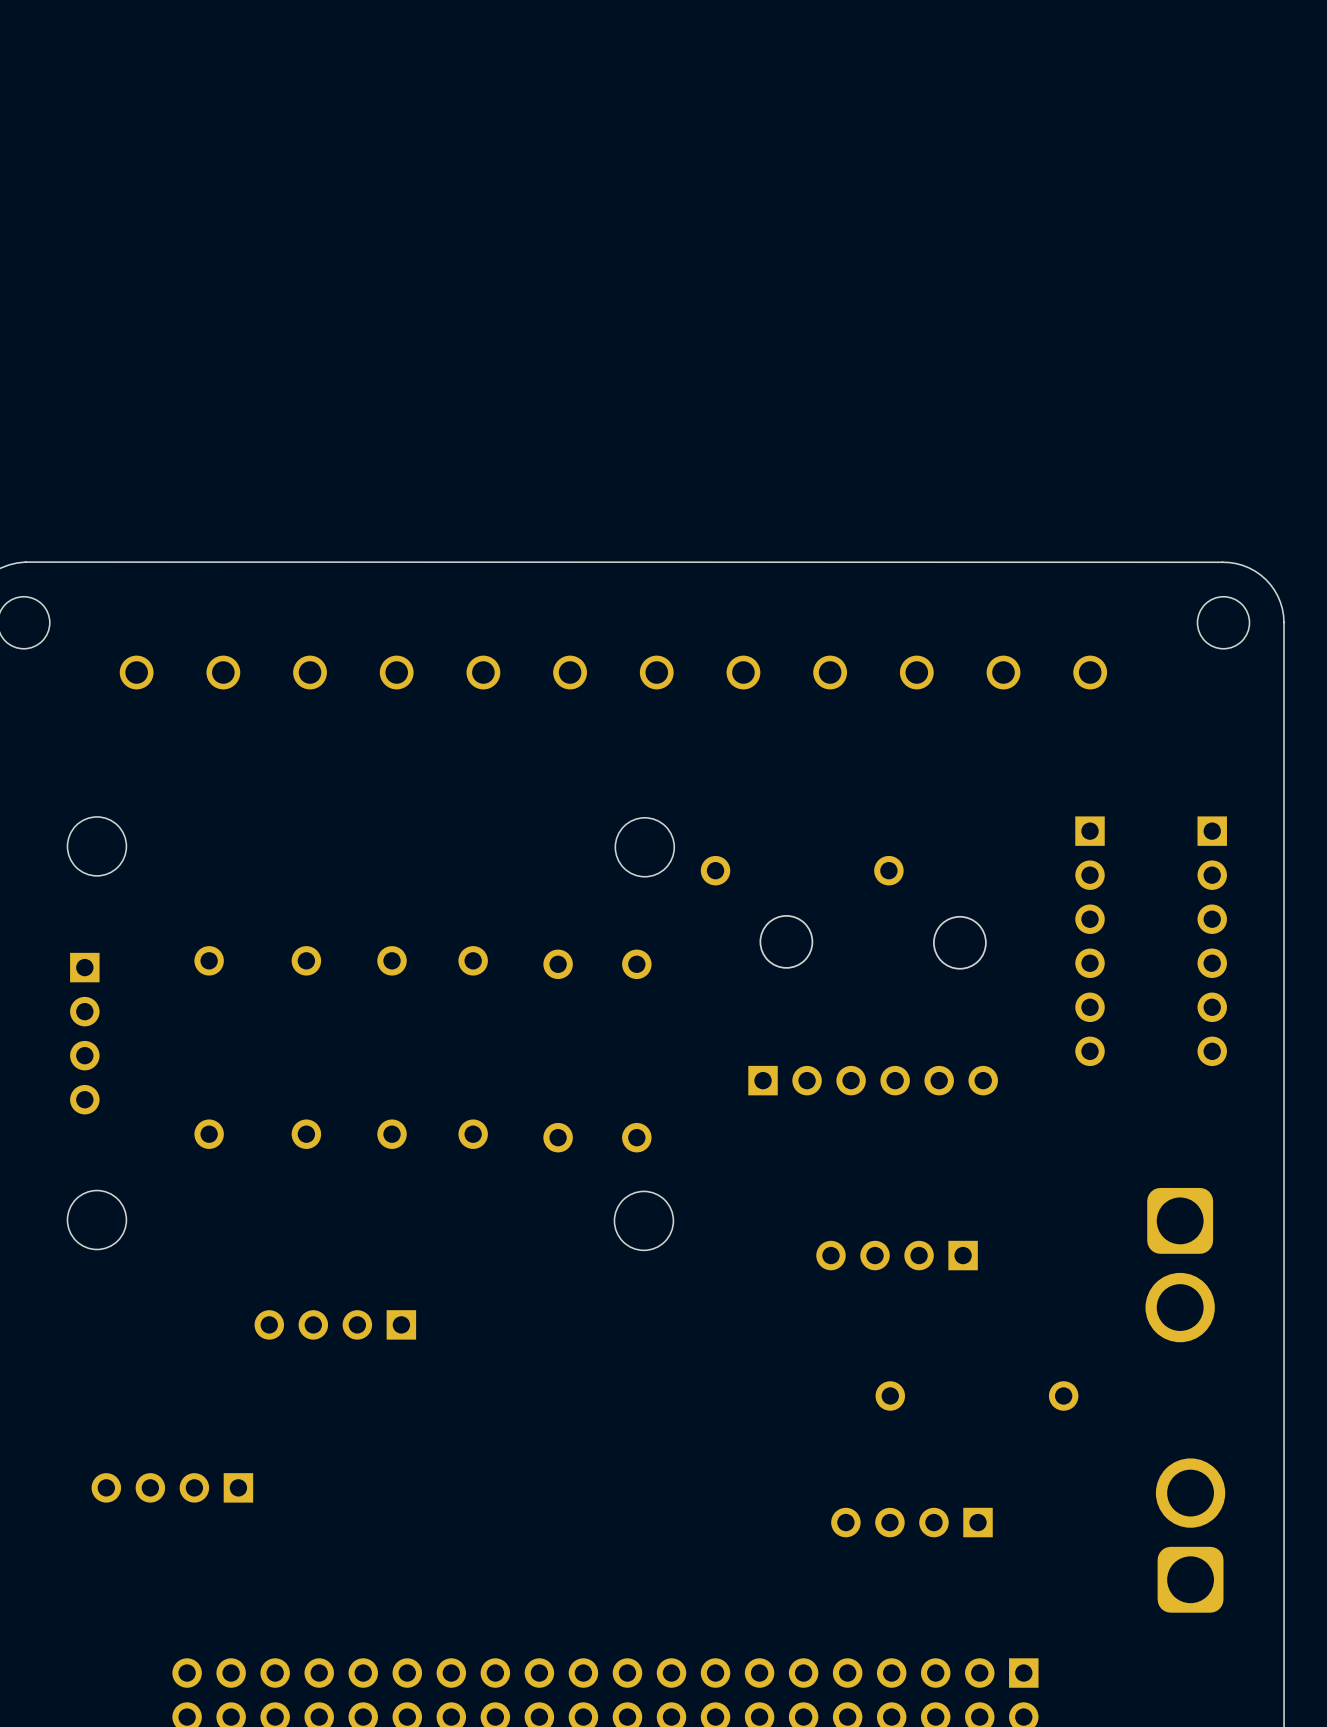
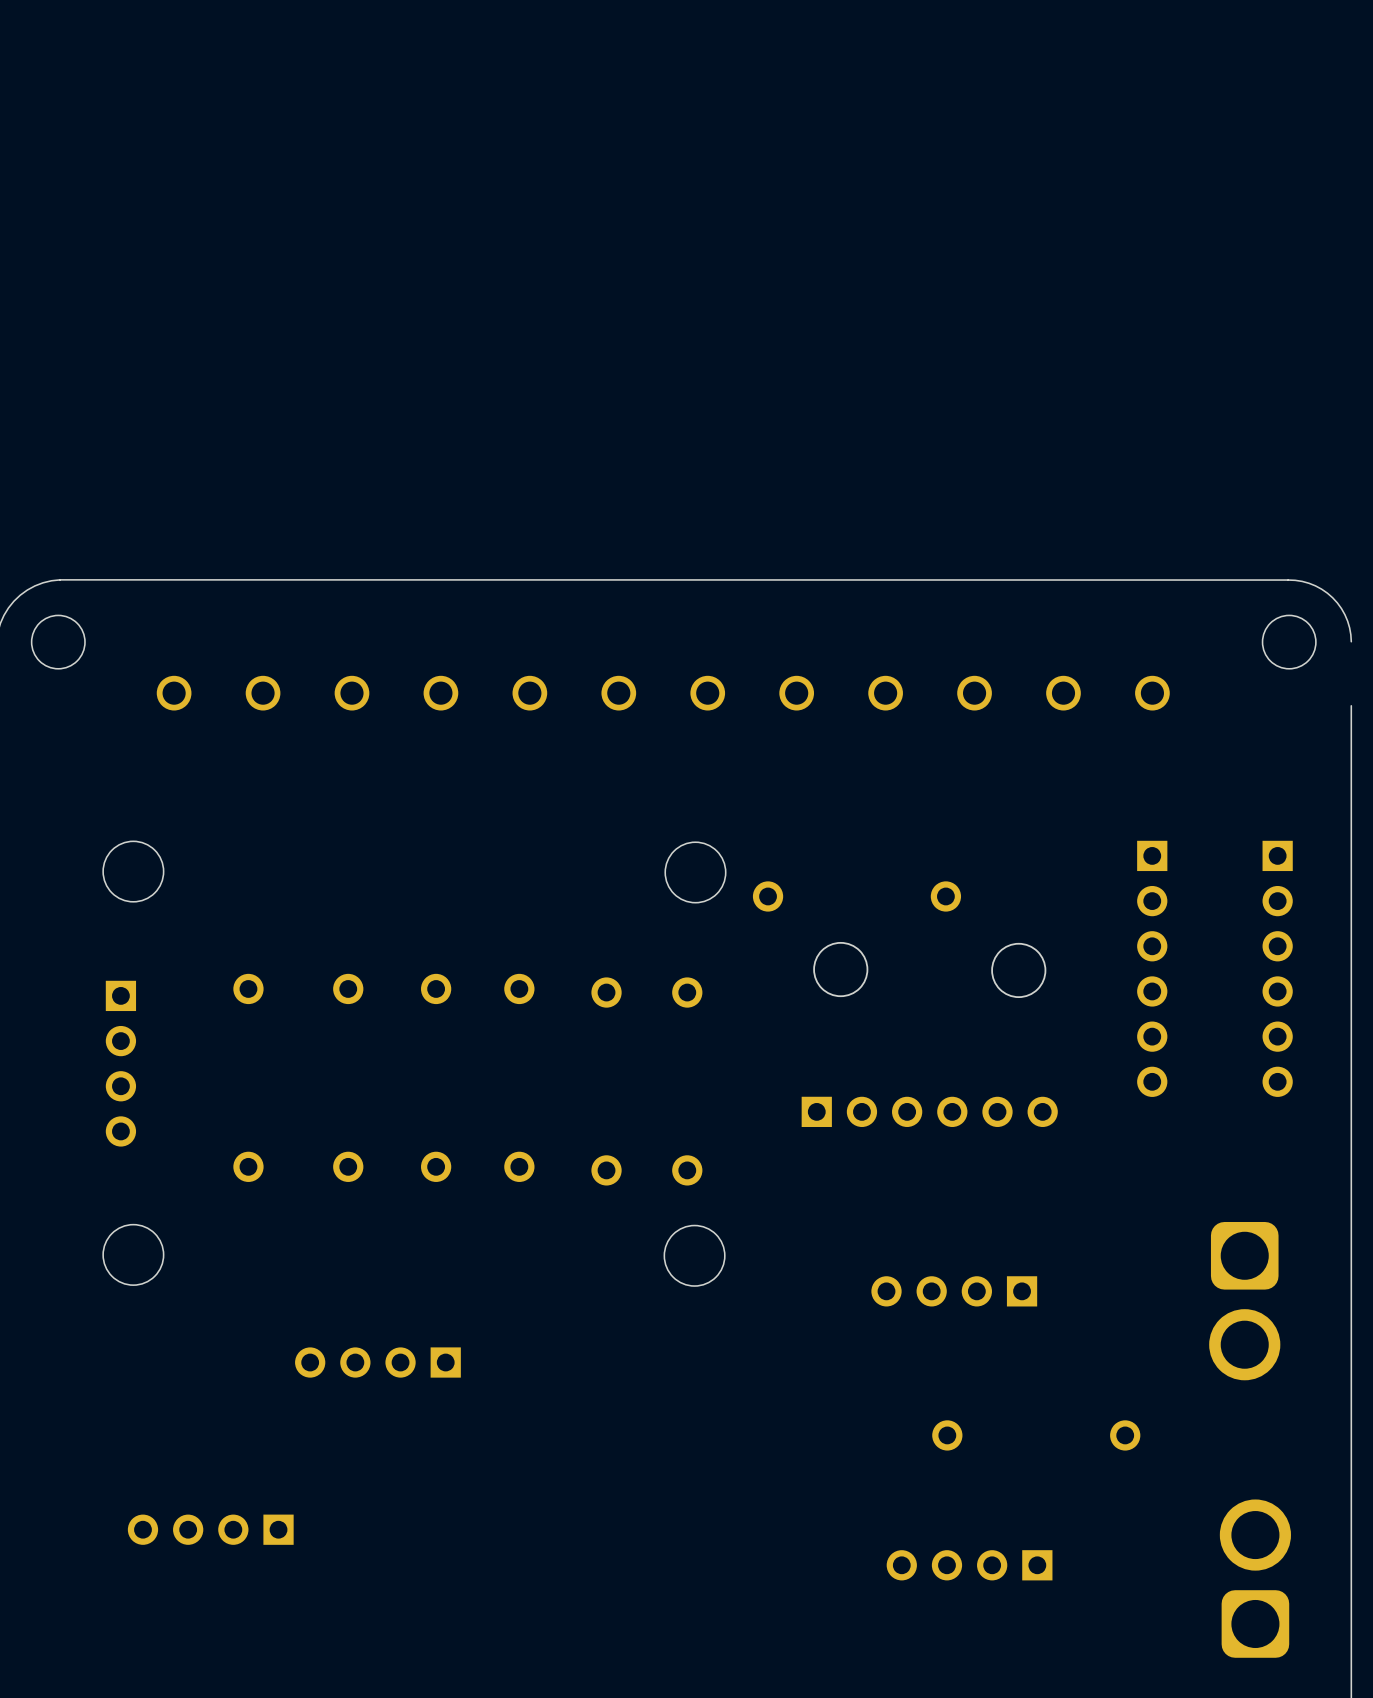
board edge: (1284, 622) (1284, 684) -> none

